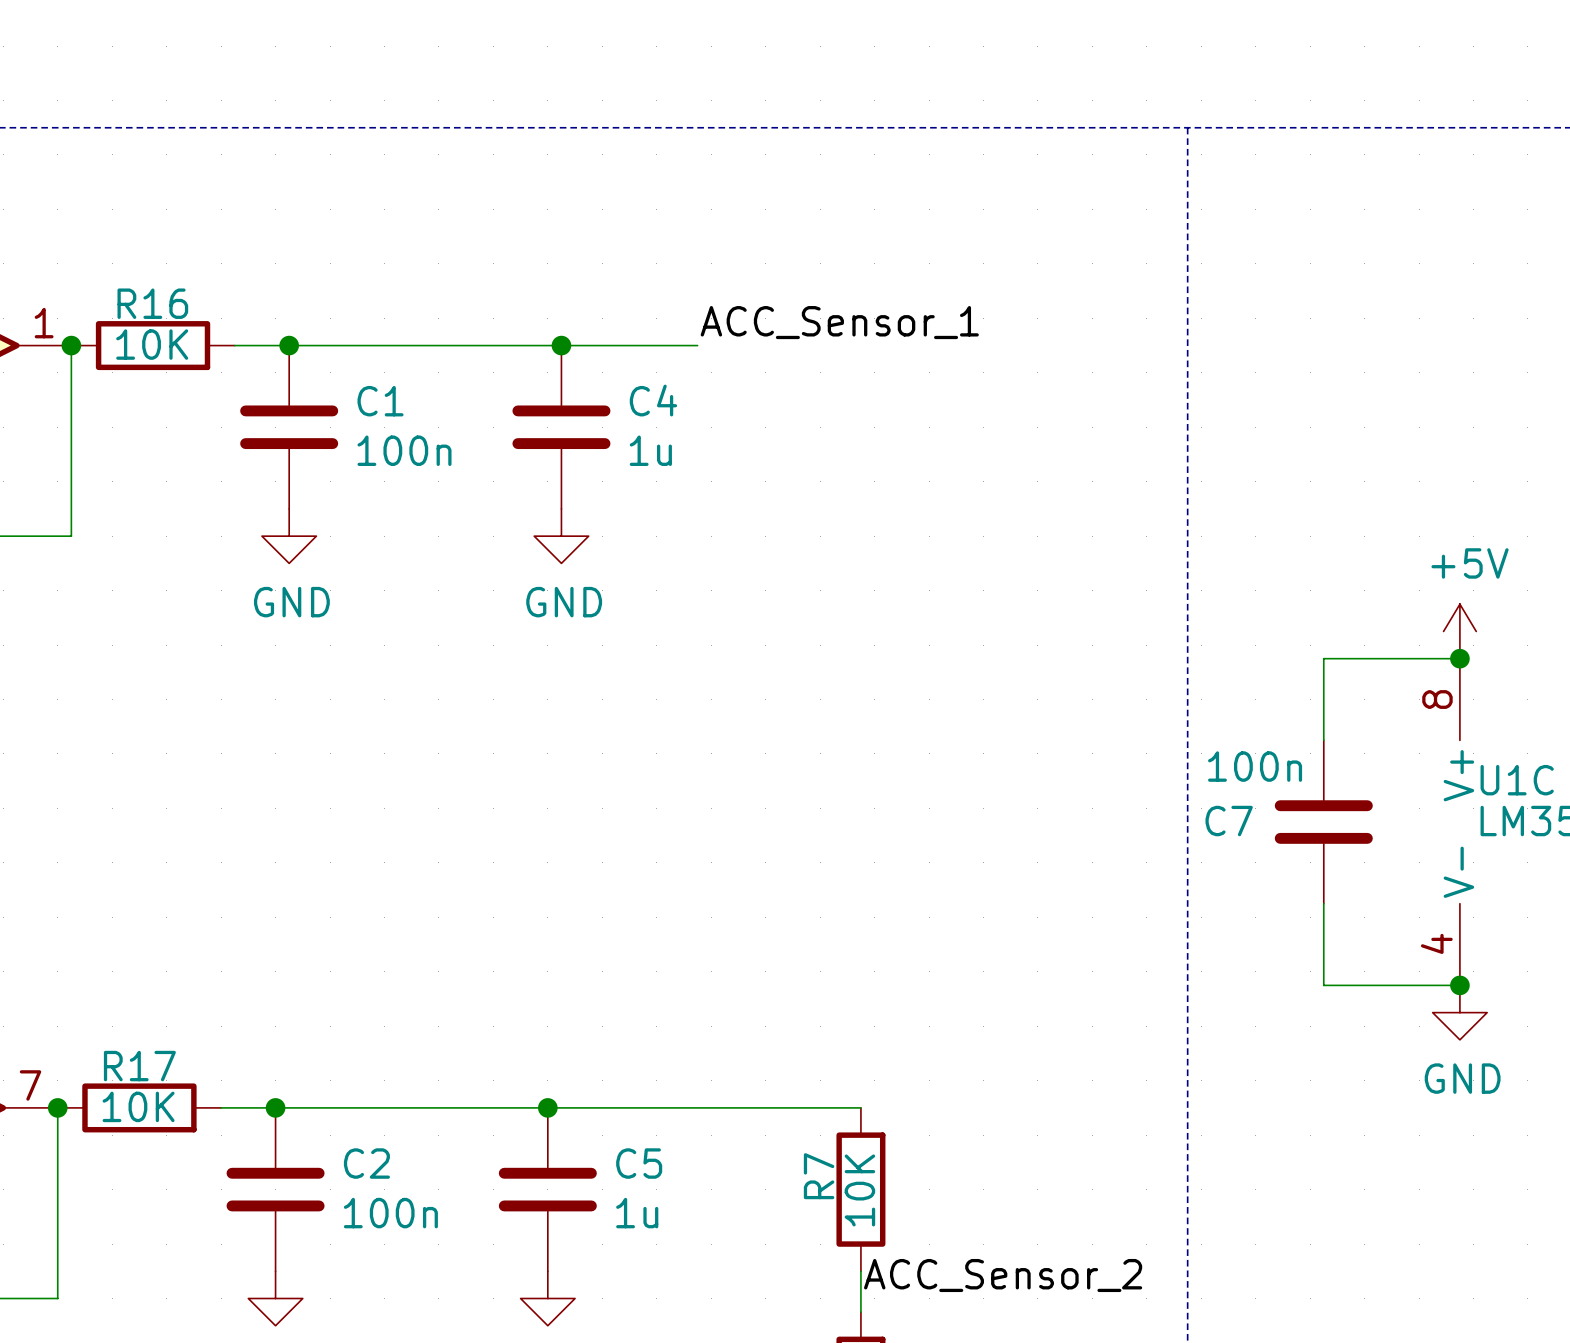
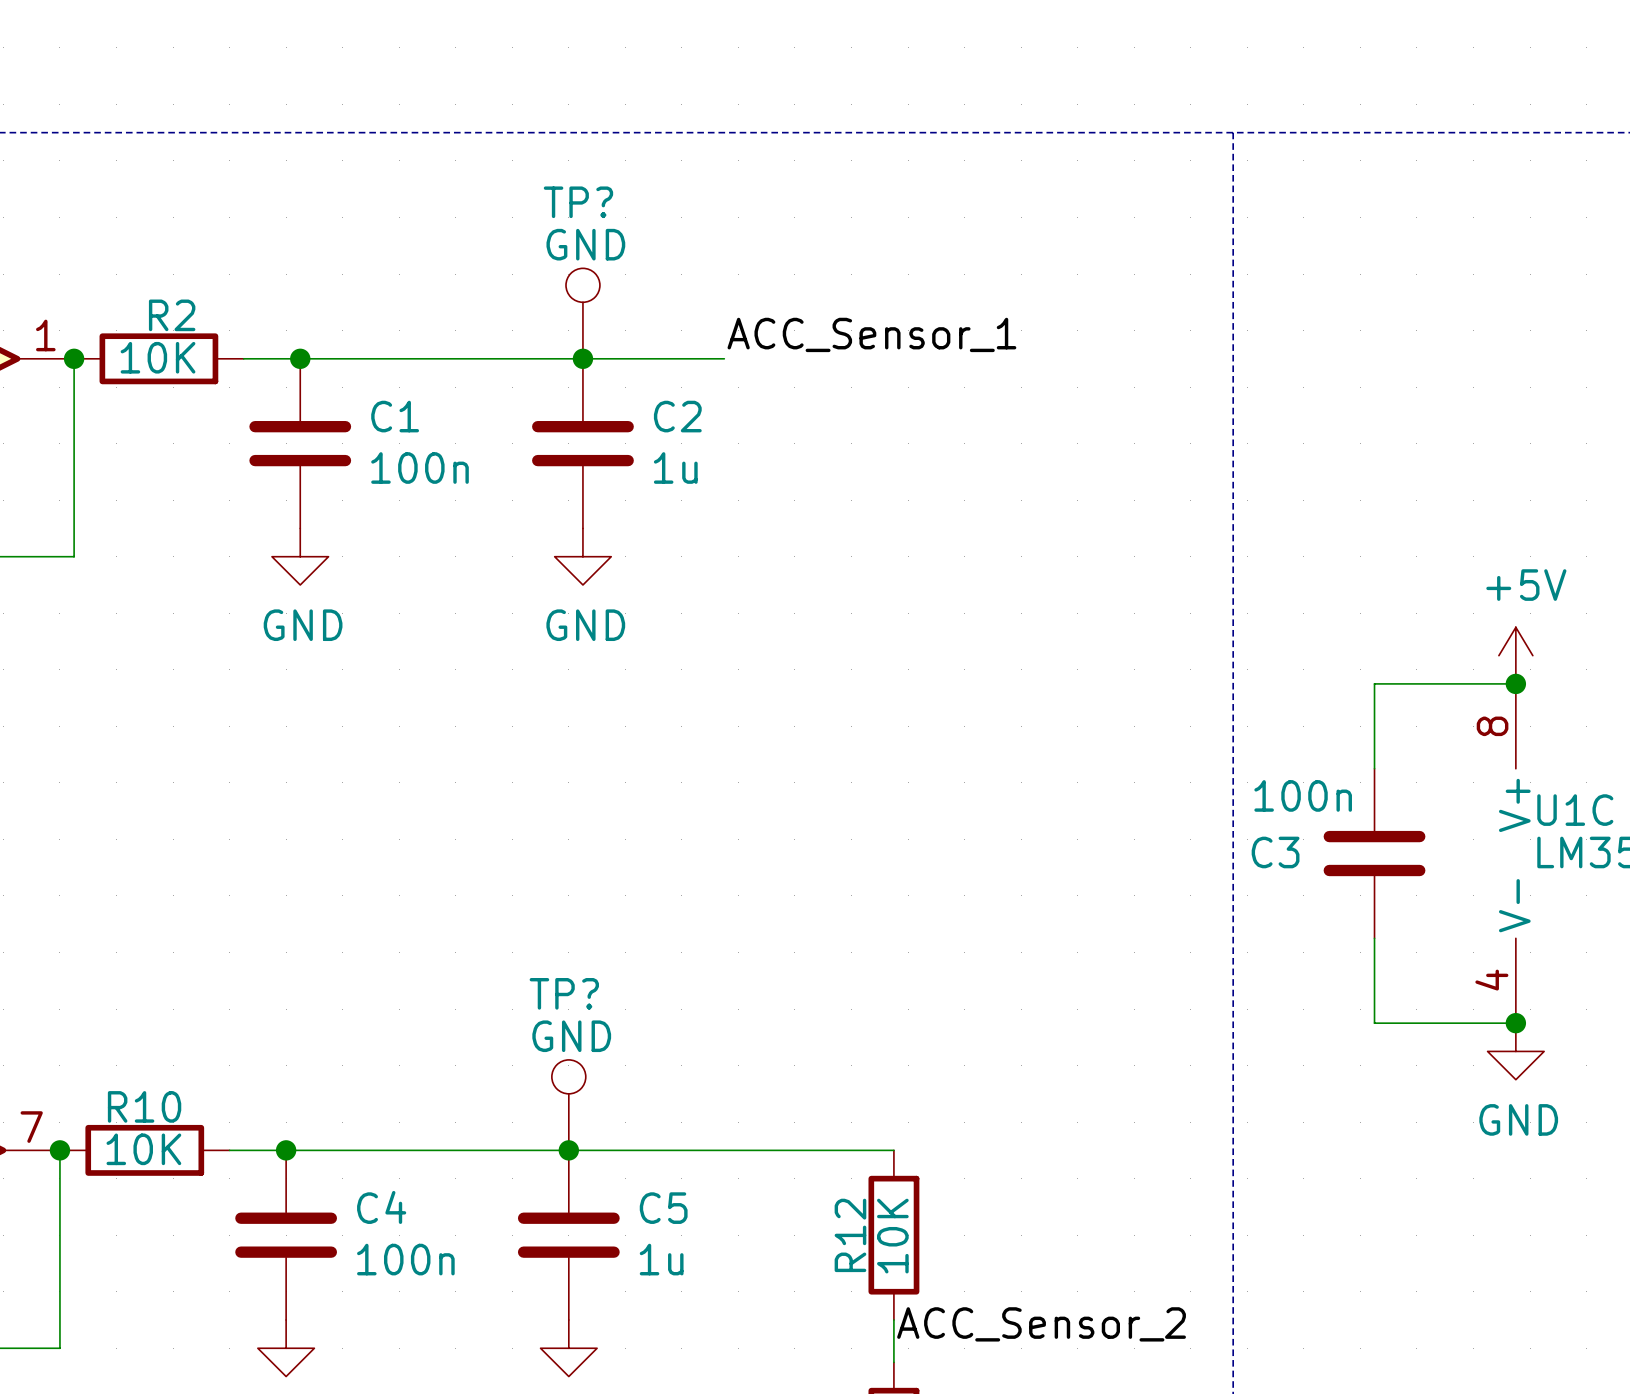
TP?: none -> GND (582, 313)
R16 name: R16 (152, 303) -> R2 (172, 315)
C4 name: C4 (653, 400) -> C2 (677, 416)
C7 name: C7 (1229, 821) -> C3 (1275, 852)
TP?: none -> GND (568, 1105)
R17 name: R17 (139, 1066) -> R10 (144, 1106)
C2 name: C2 (366, 1163) -> C4 (381, 1207)
R7 name: R7 (819, 1176) -> R12 (850, 1235)

